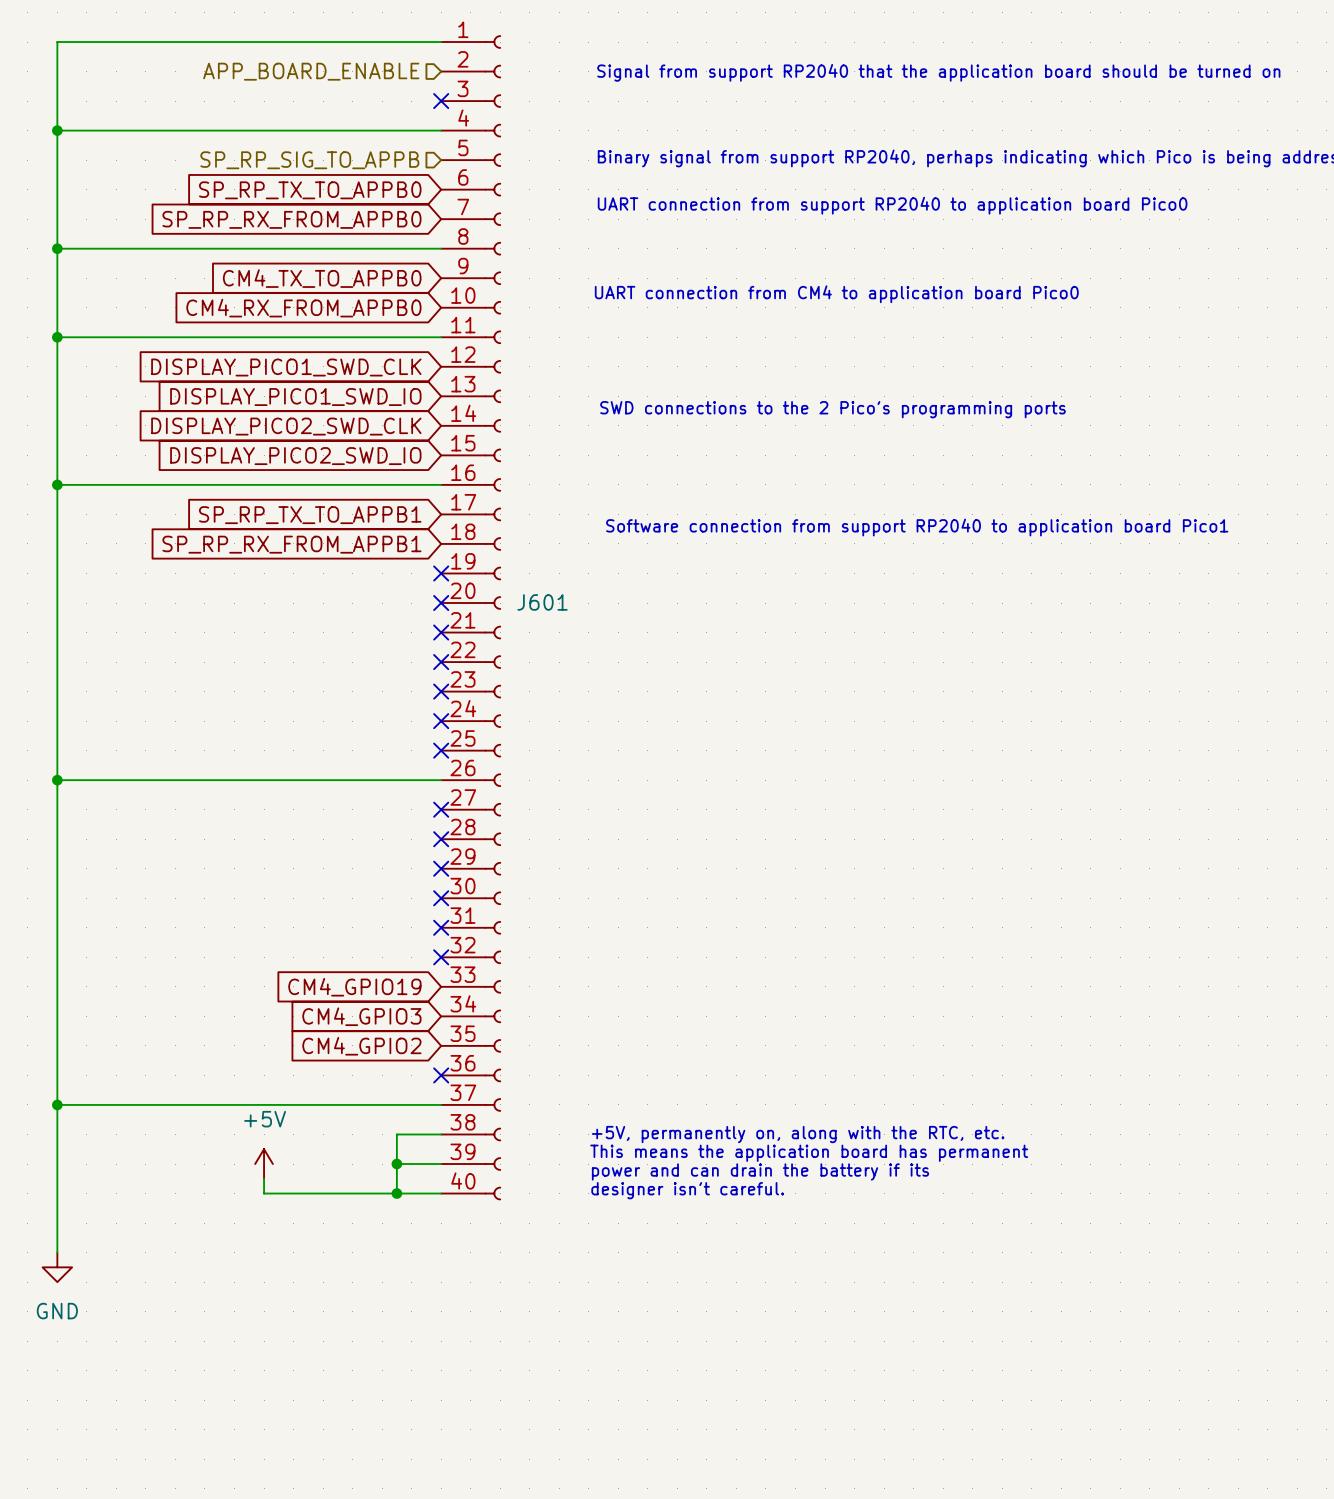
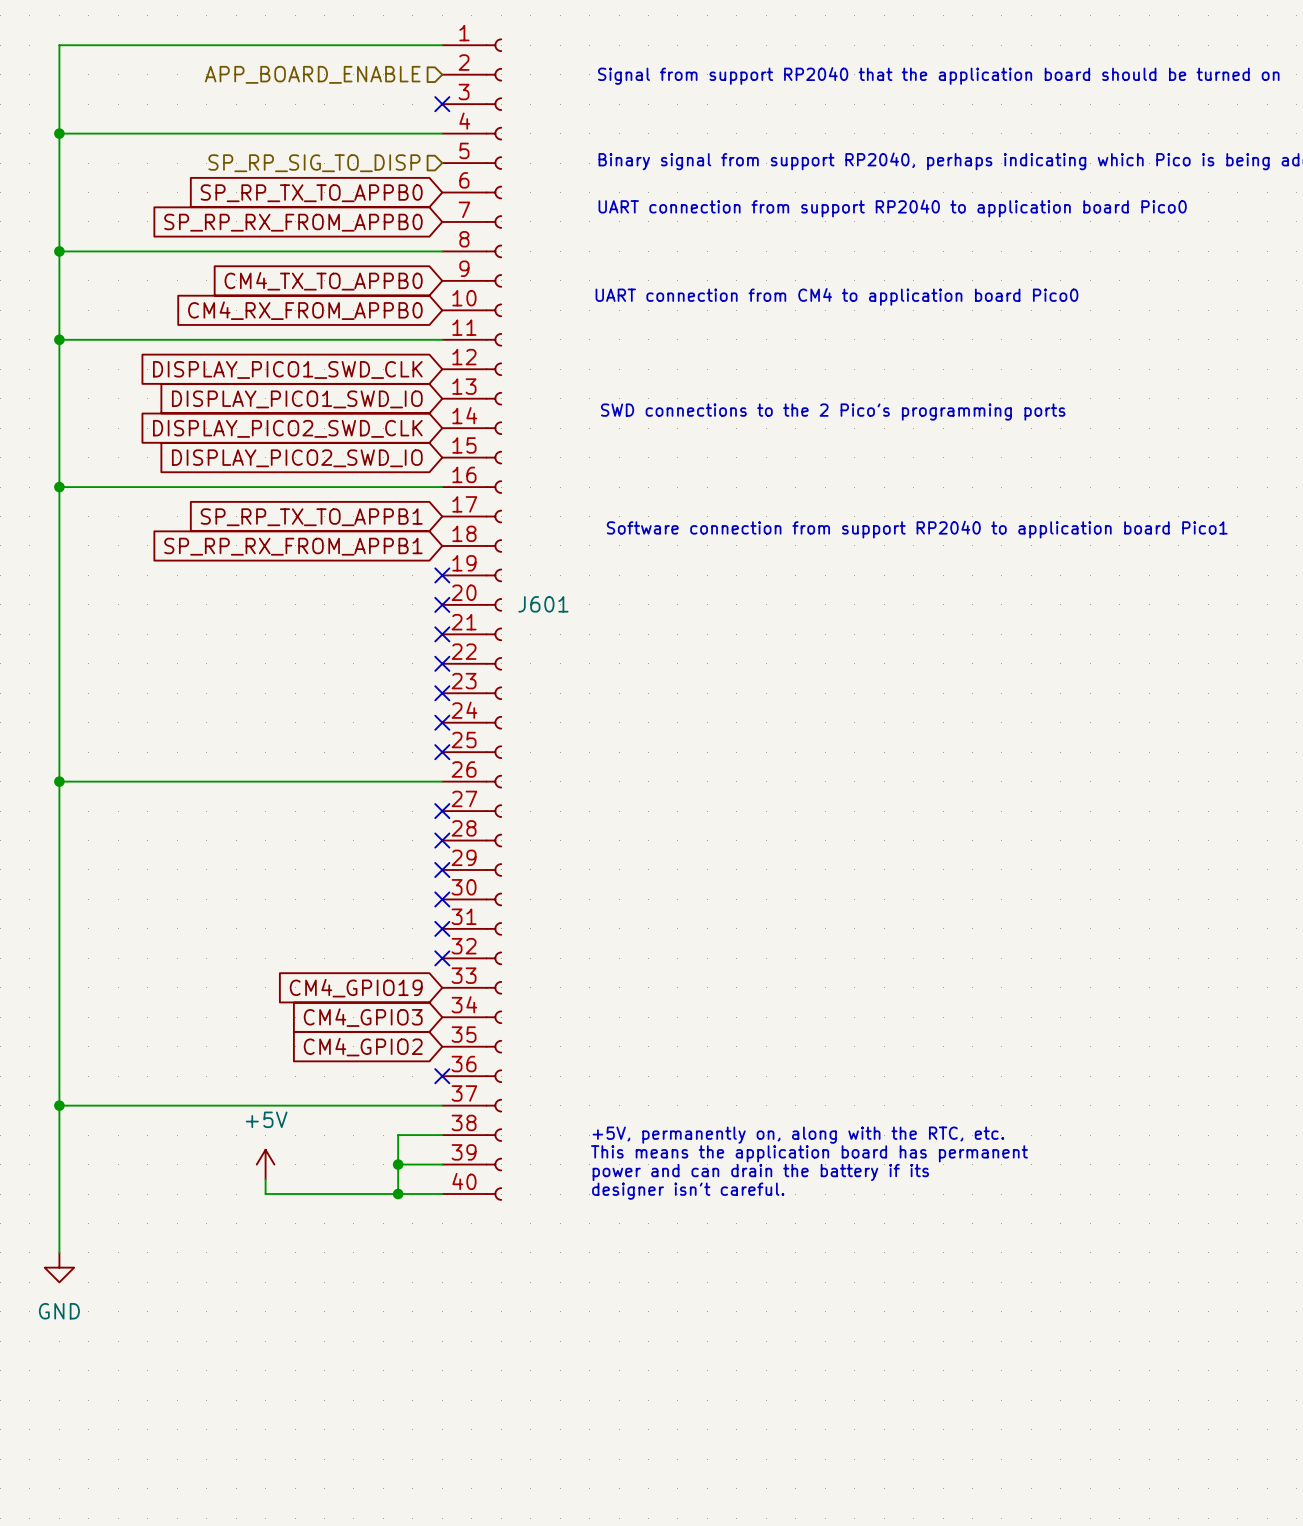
hierarchical label: SP_RP_SIG_TO_APPB (309, 160) -> SP_RP_SIG_TO_DISP (314, 163)

